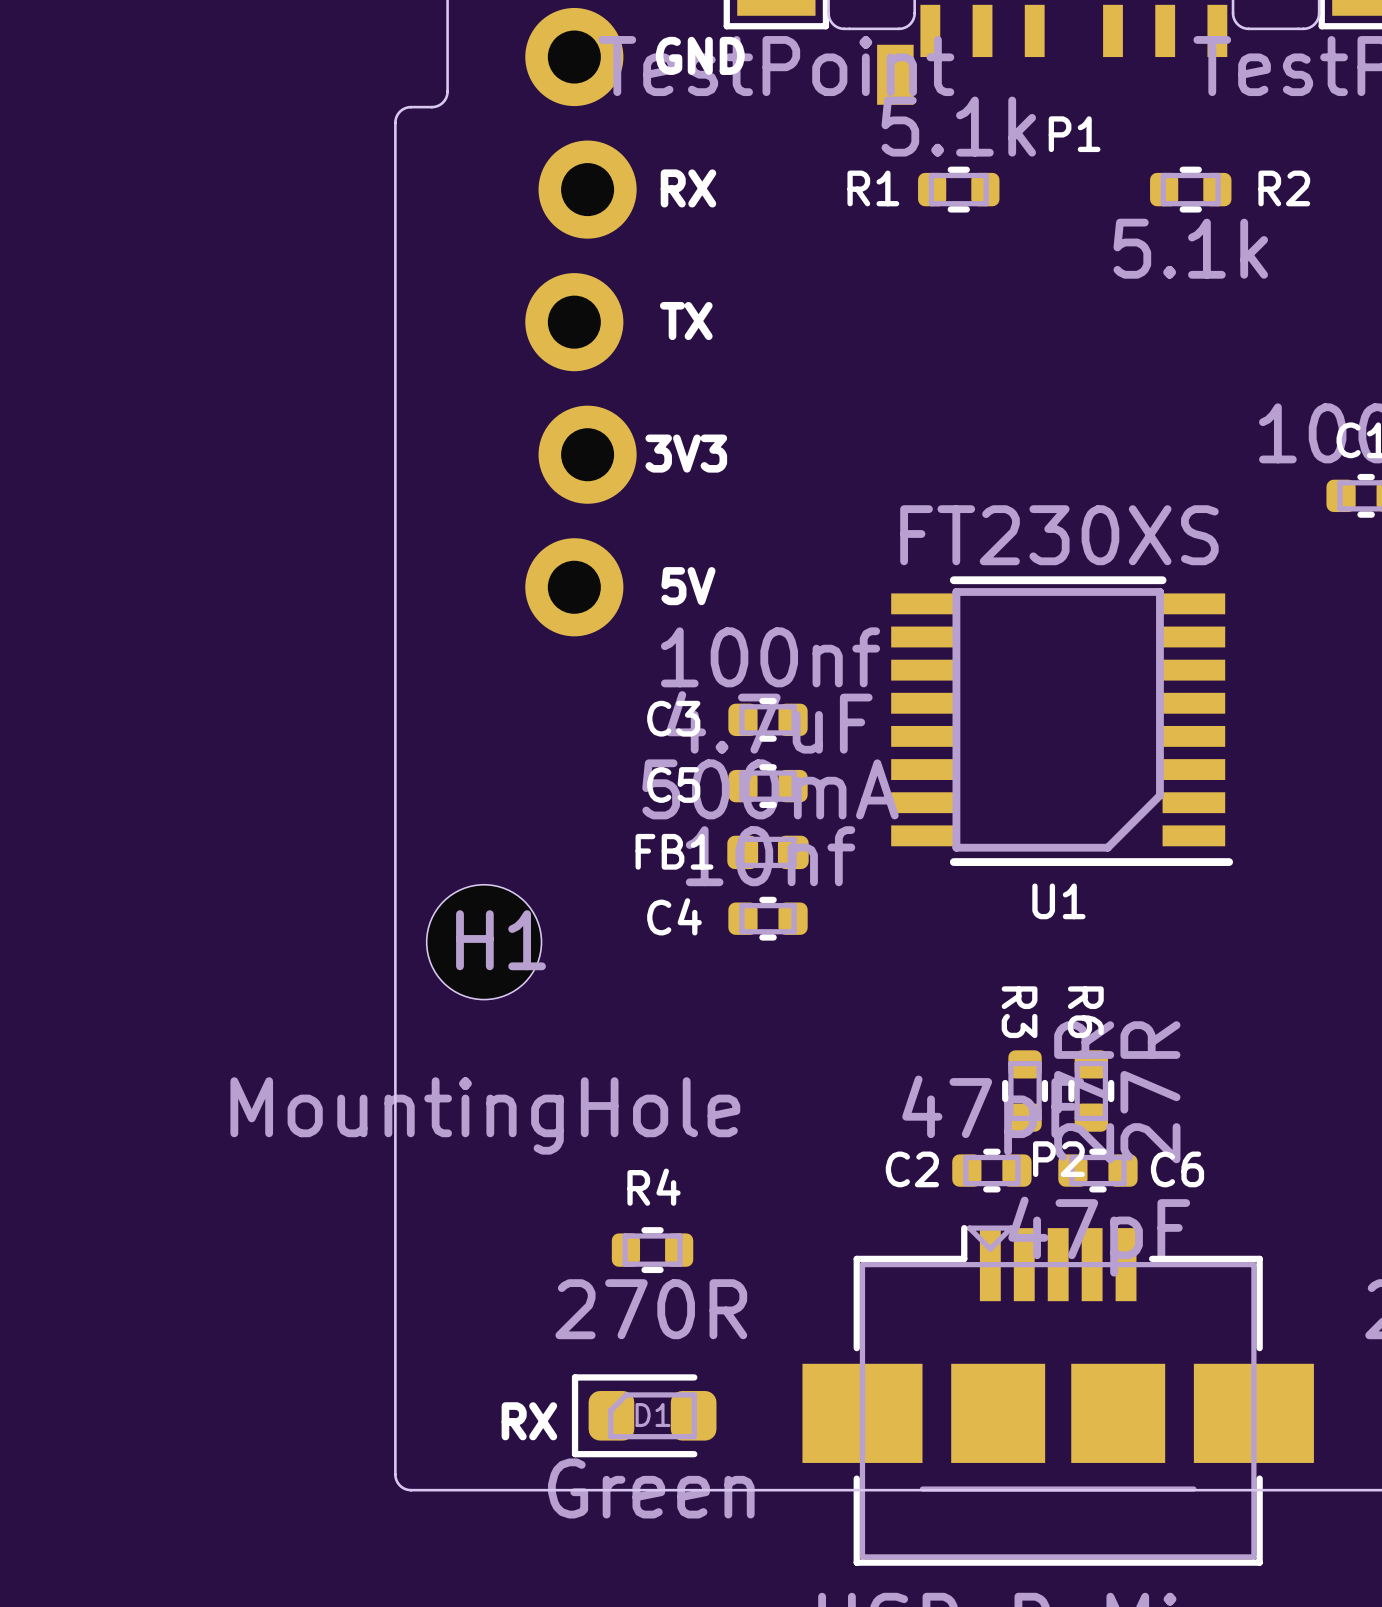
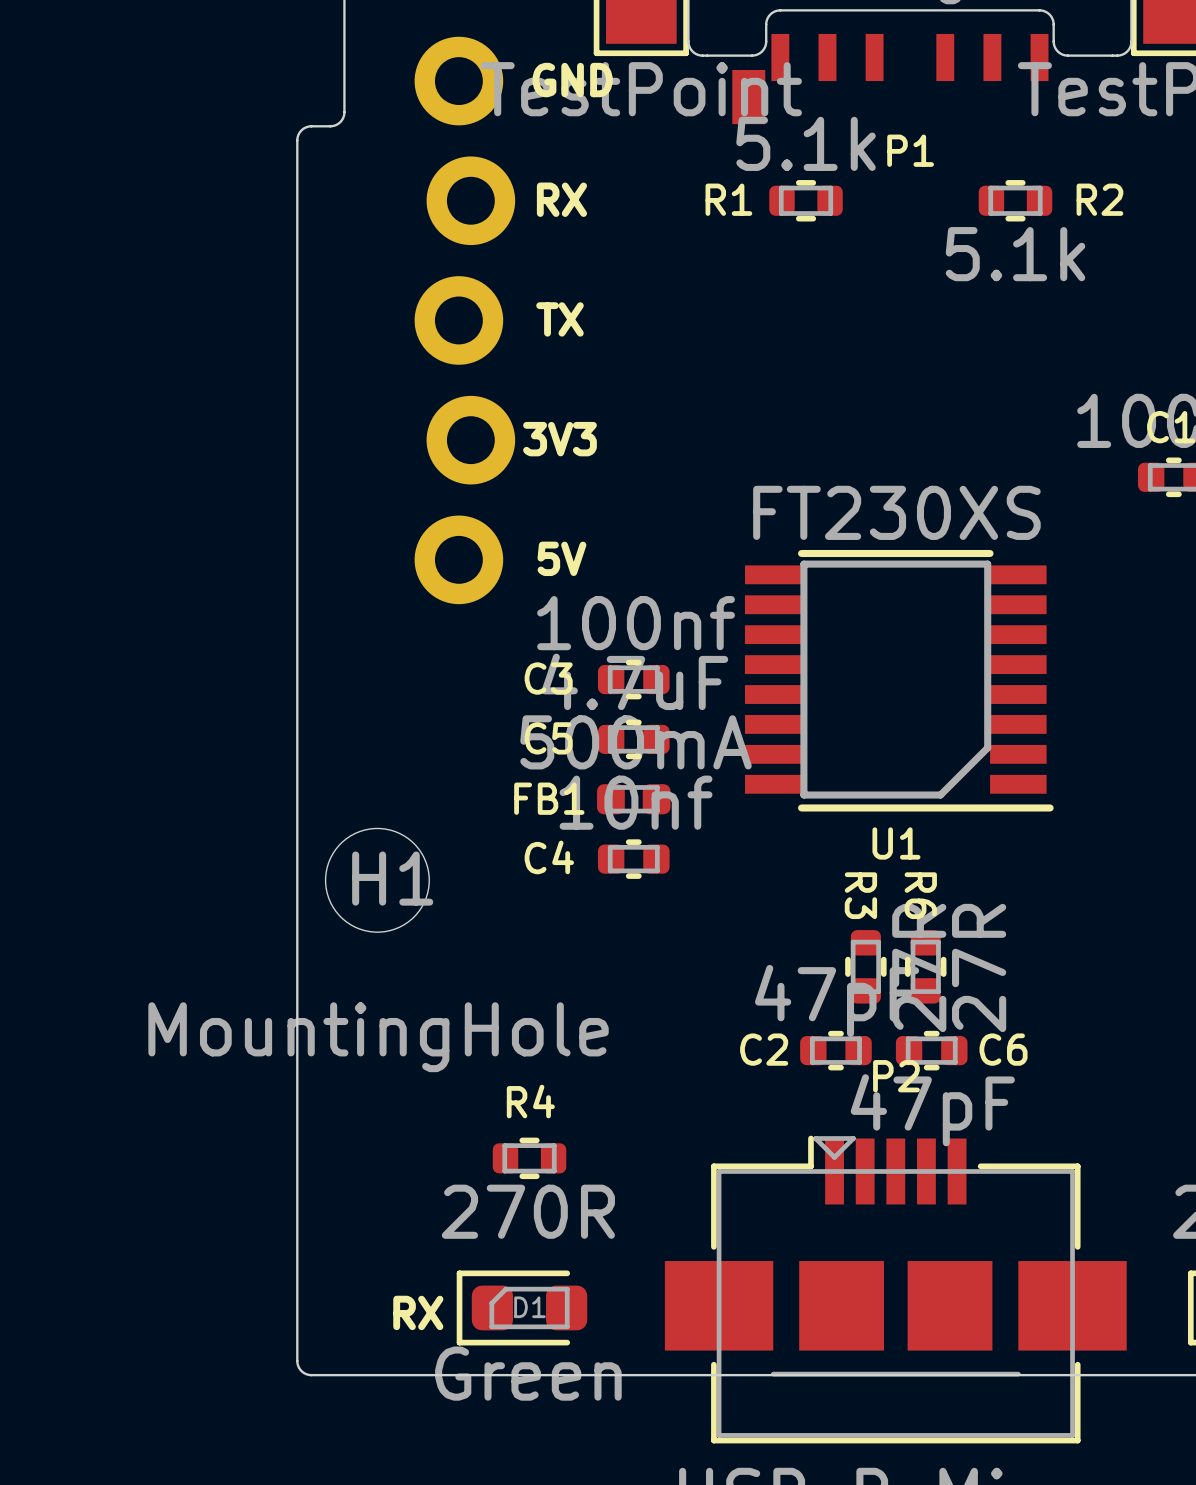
R3 position: (1025, 1091) -> (865, 966)
R6 position: (1091, 1091) -> (925, 966)
C2 position: (991, 1170) -> (835, 1050)
C6 position: (1097, 1170) -> (931, 1050)

